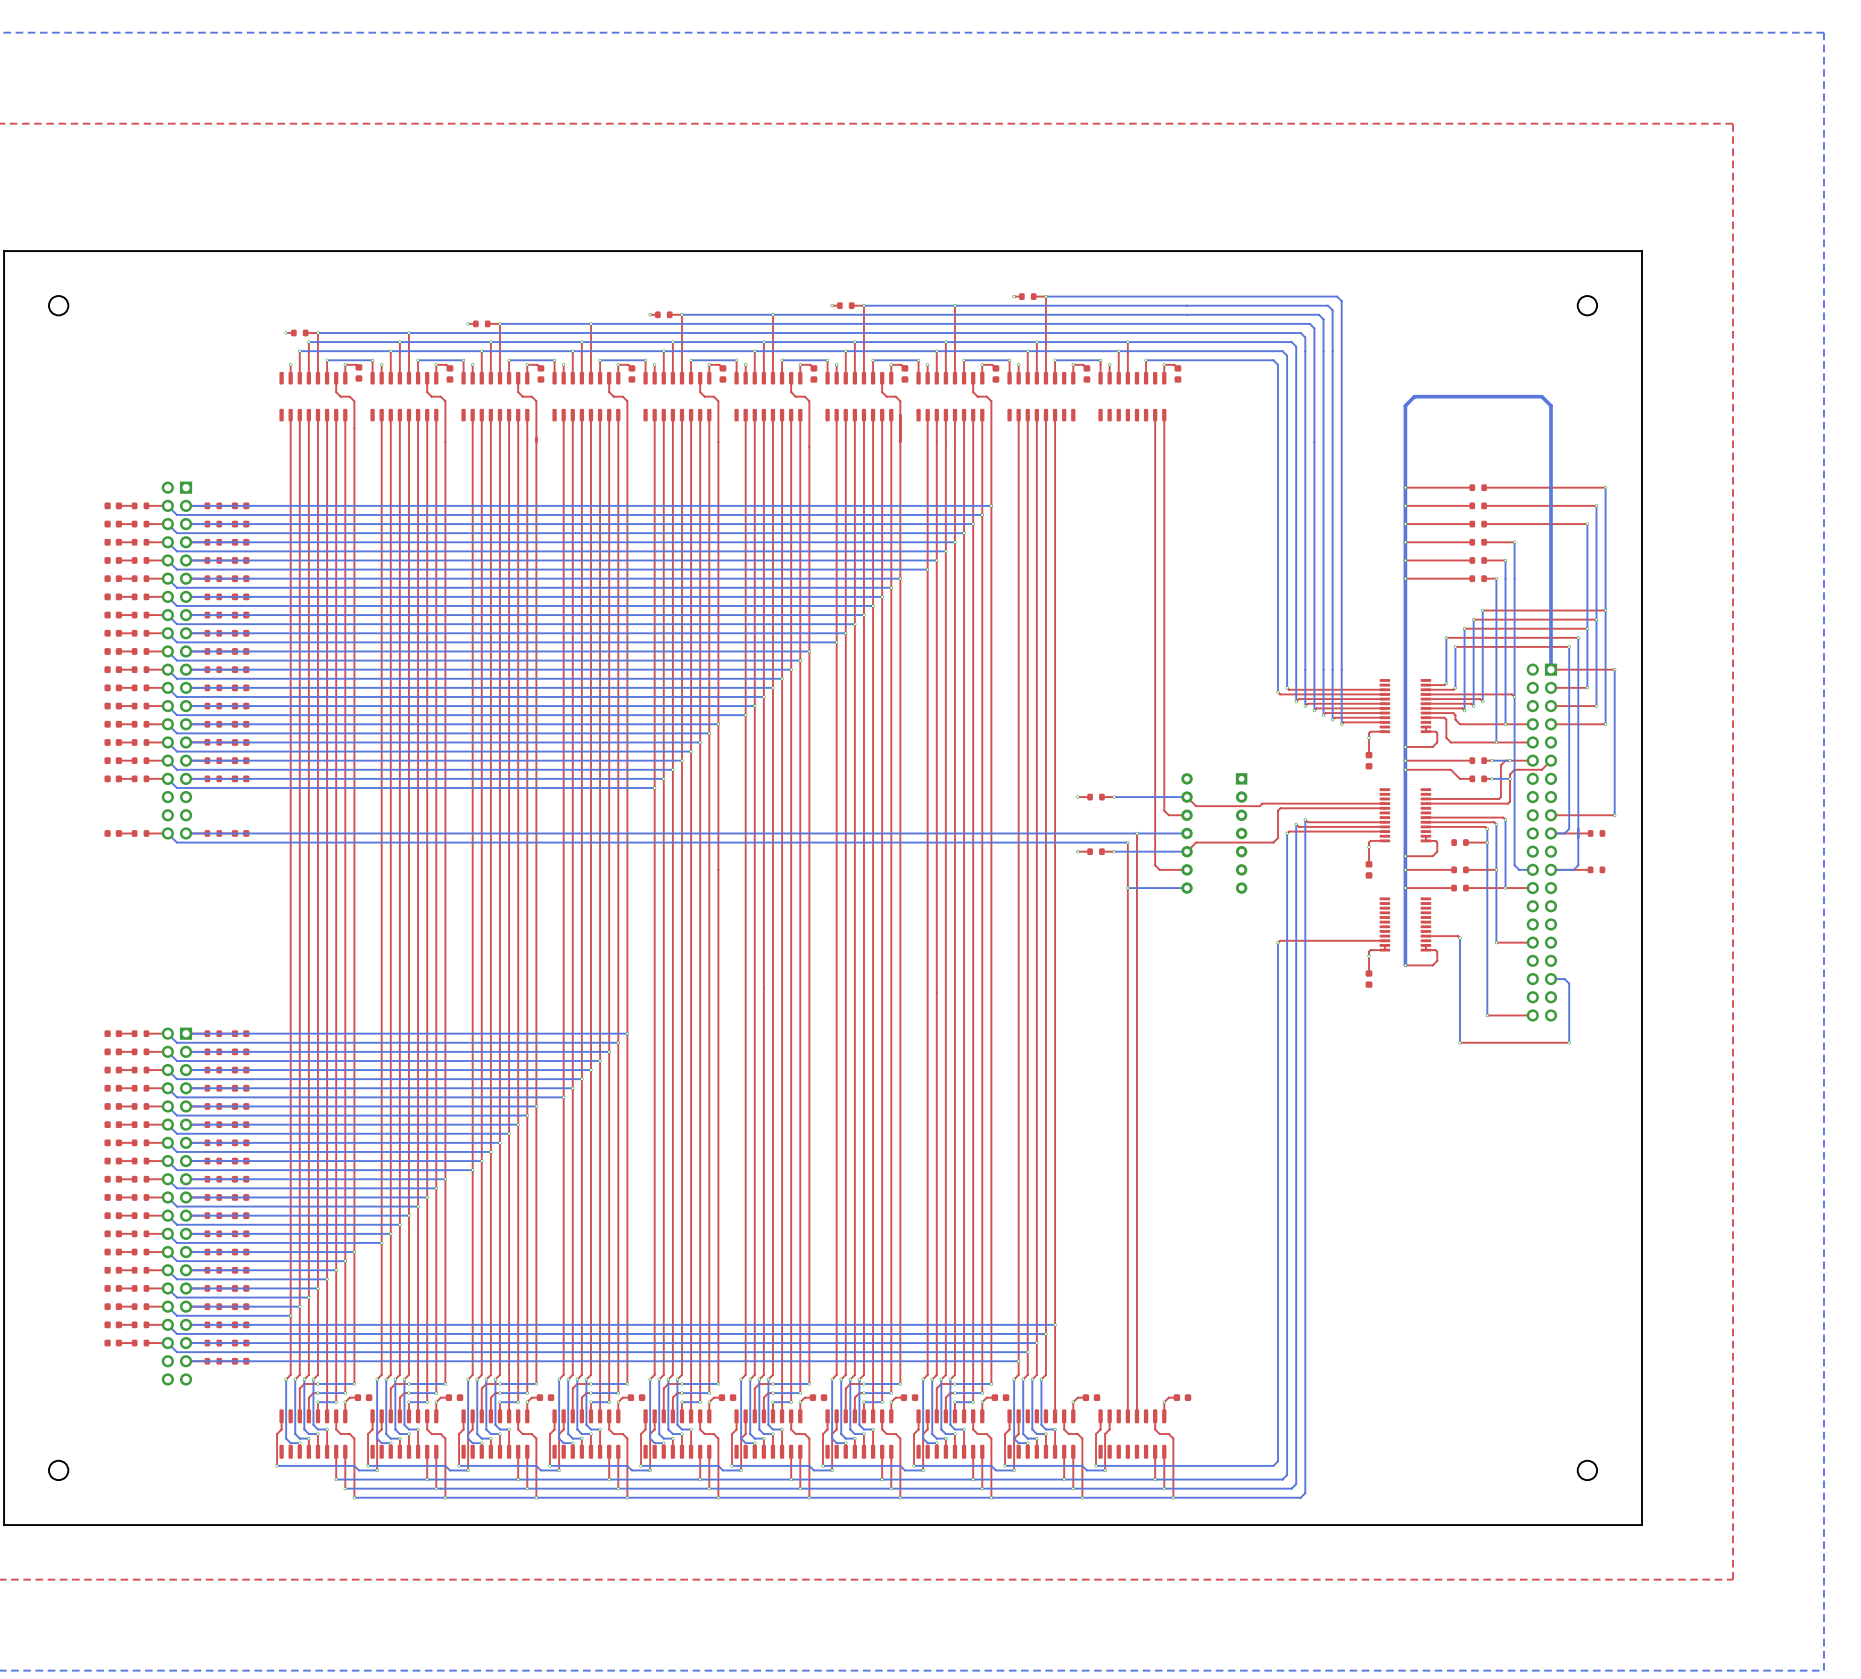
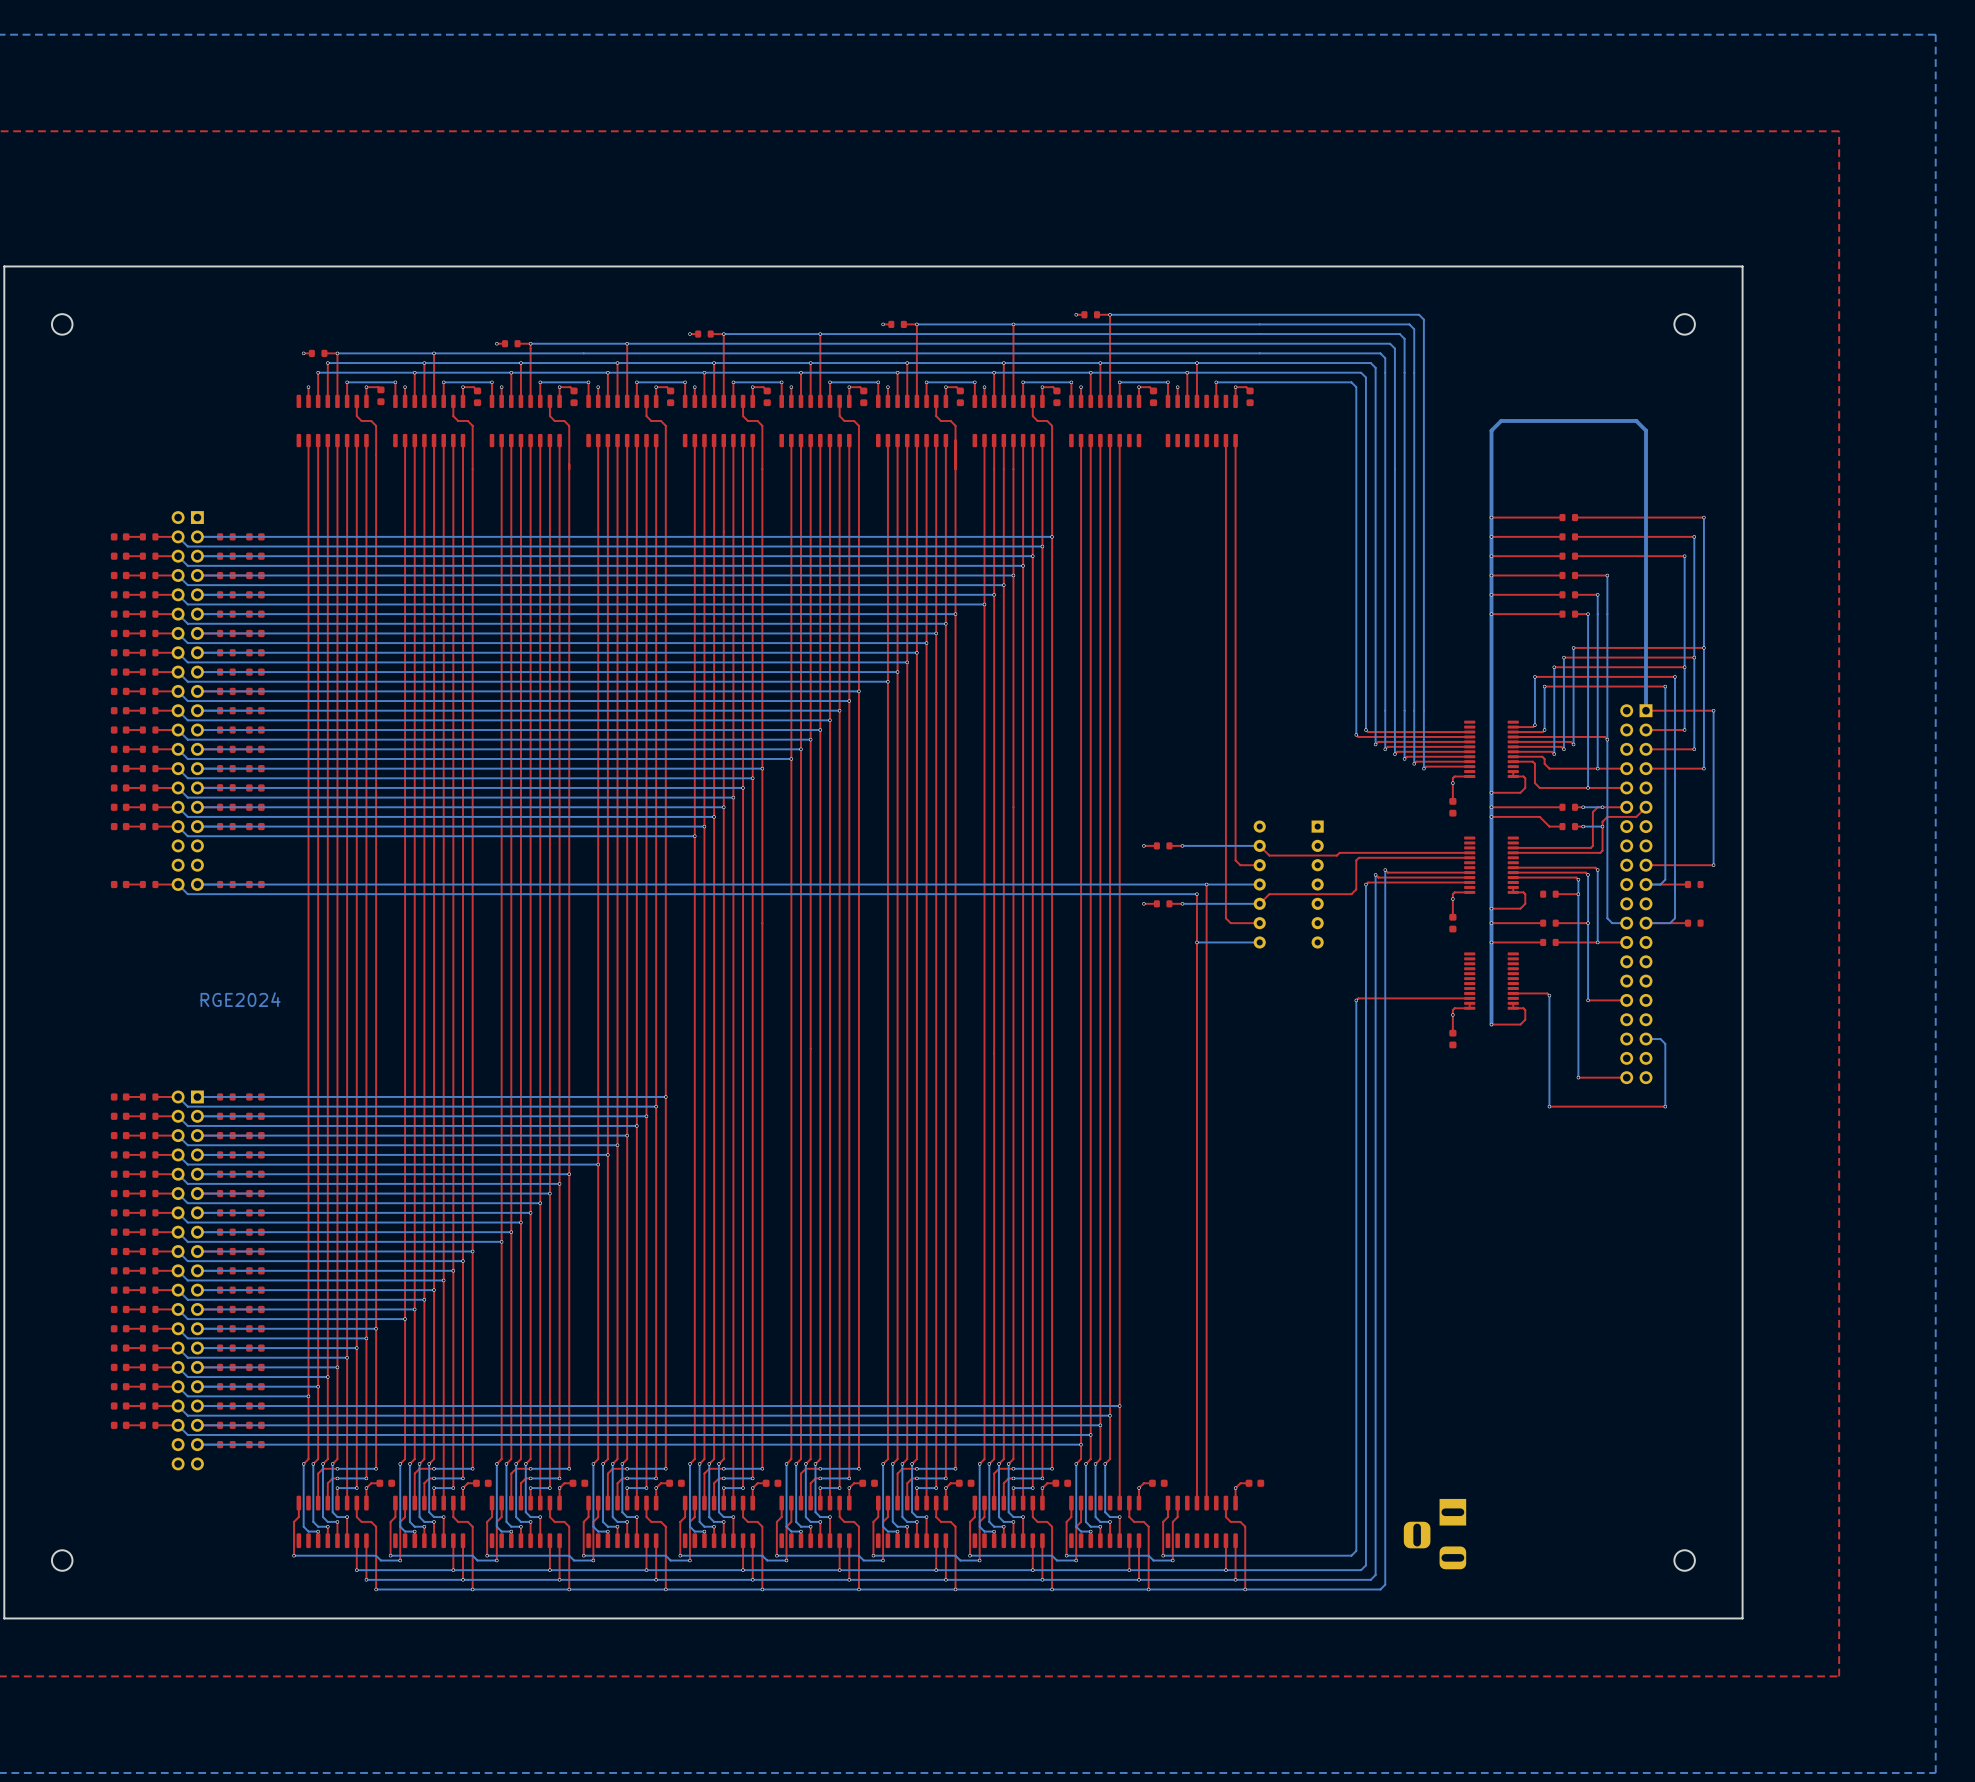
text: none -> RGE2024 (240, 999)
part: none -> (1435, 1534)

